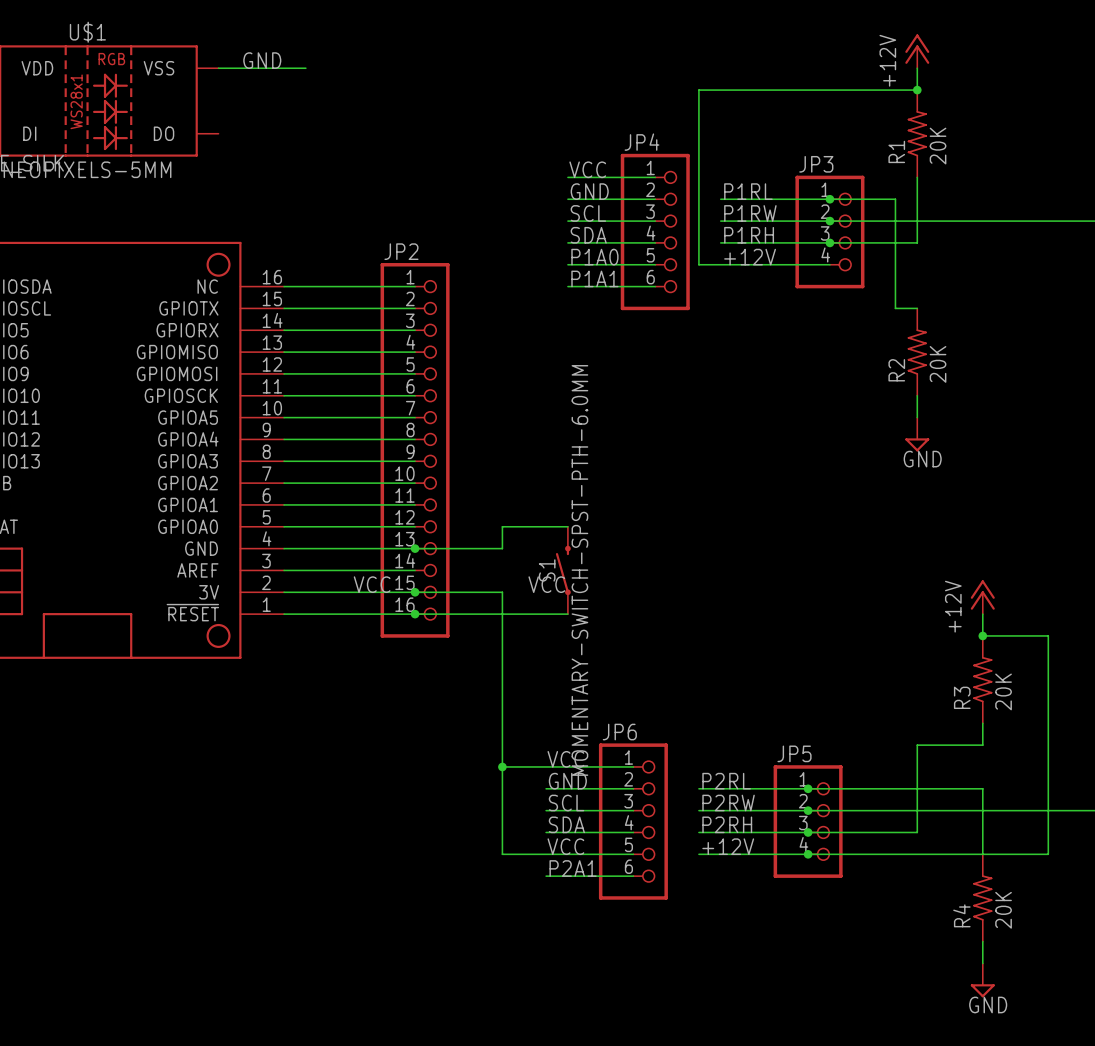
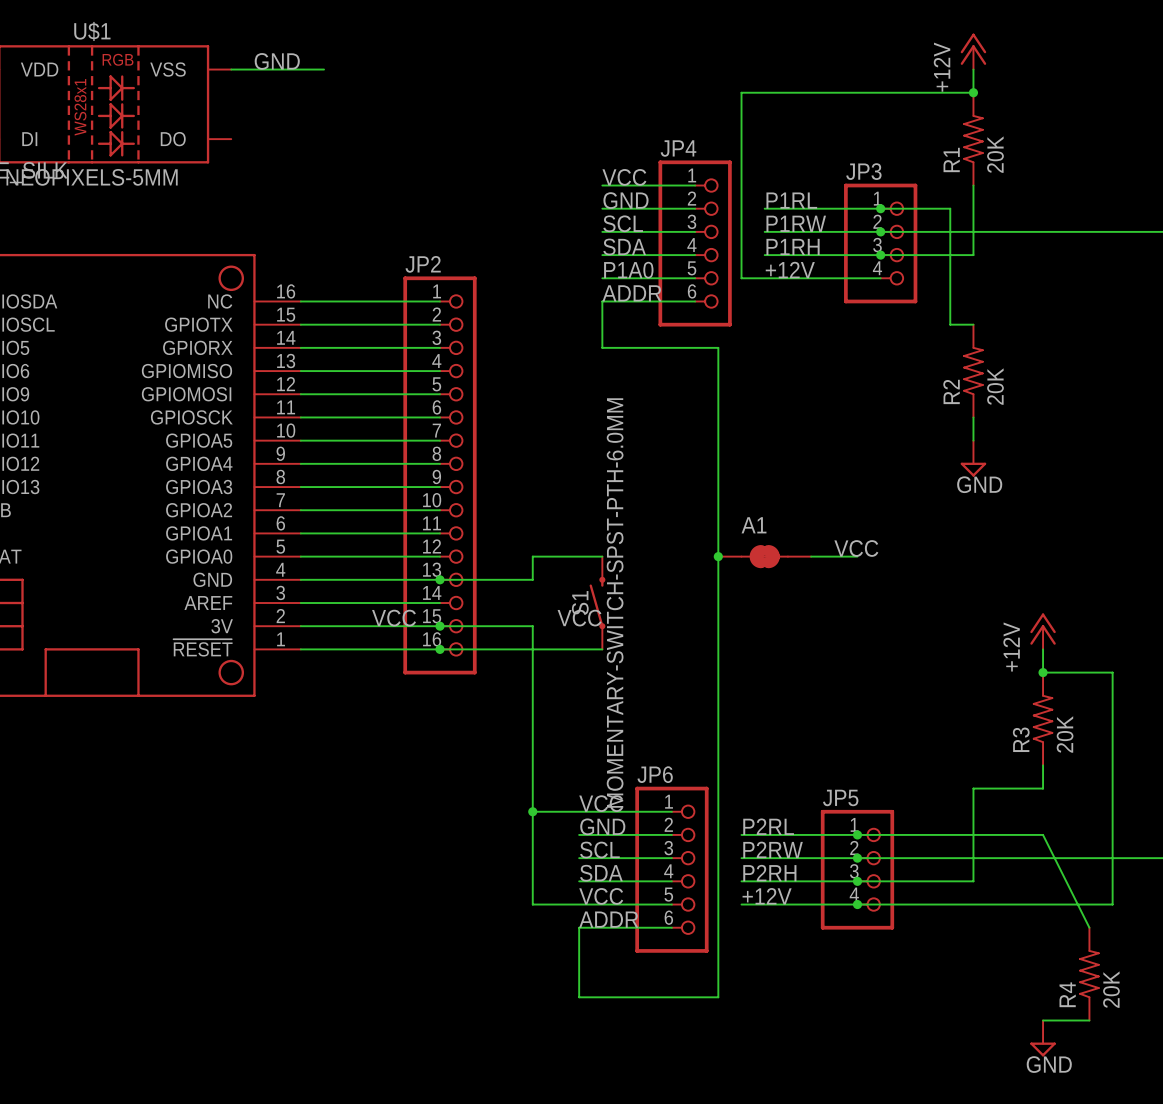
label: P1A1 (594, 278) -> ADDR (631, 293)
wire: none -> (602, 301) (602, 347) (718, 347) (718, 997) (579, 997) (579, 927)
label: none -> VCC (856, 548)
junction: none -> (718, 556)
A1: none -> (764, 556)
wire: none -> (811, 556) (857, 556)
wire: (982, 788) (982, 854) -> (1043, 834) (1089, 927)
label: P2A1 (573, 868) -> ADDR (608, 919)
R4 position: (982, 897) -> (1089, 974)
wire: (982, 941) (982, 963) -> (1089, 1020) (1043, 1020)

